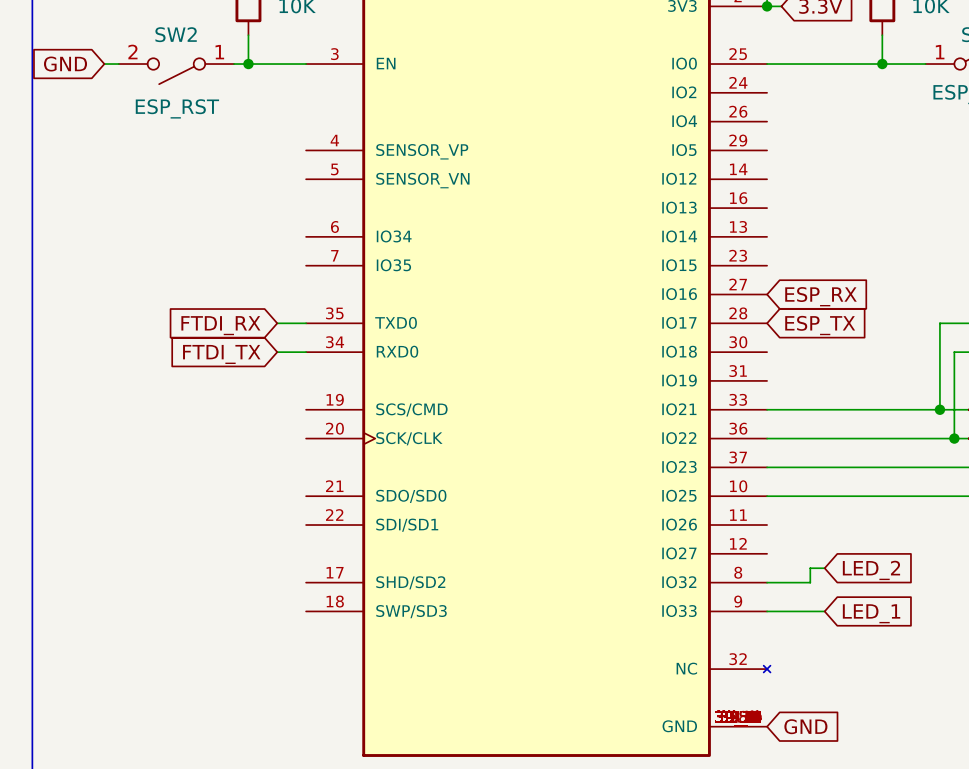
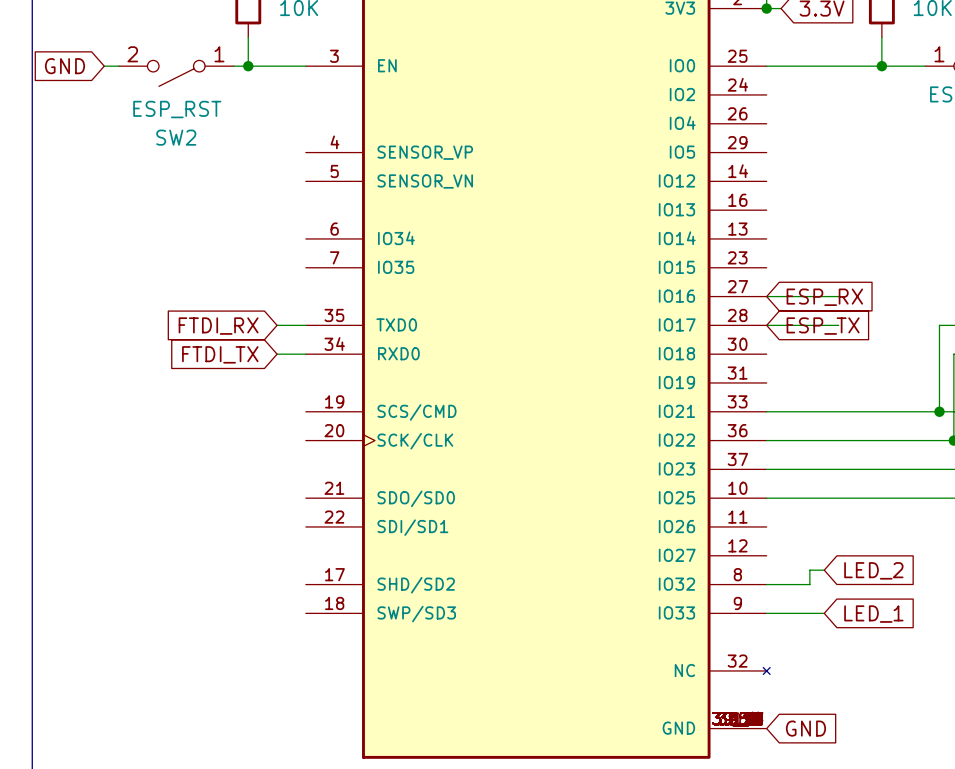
SW2 name position: SW2 (176, 34) -> SW2 (176, 137)
wire: none -> (766, 296) (838, 296)
wire: none -> (766, 325) (838, 325)

